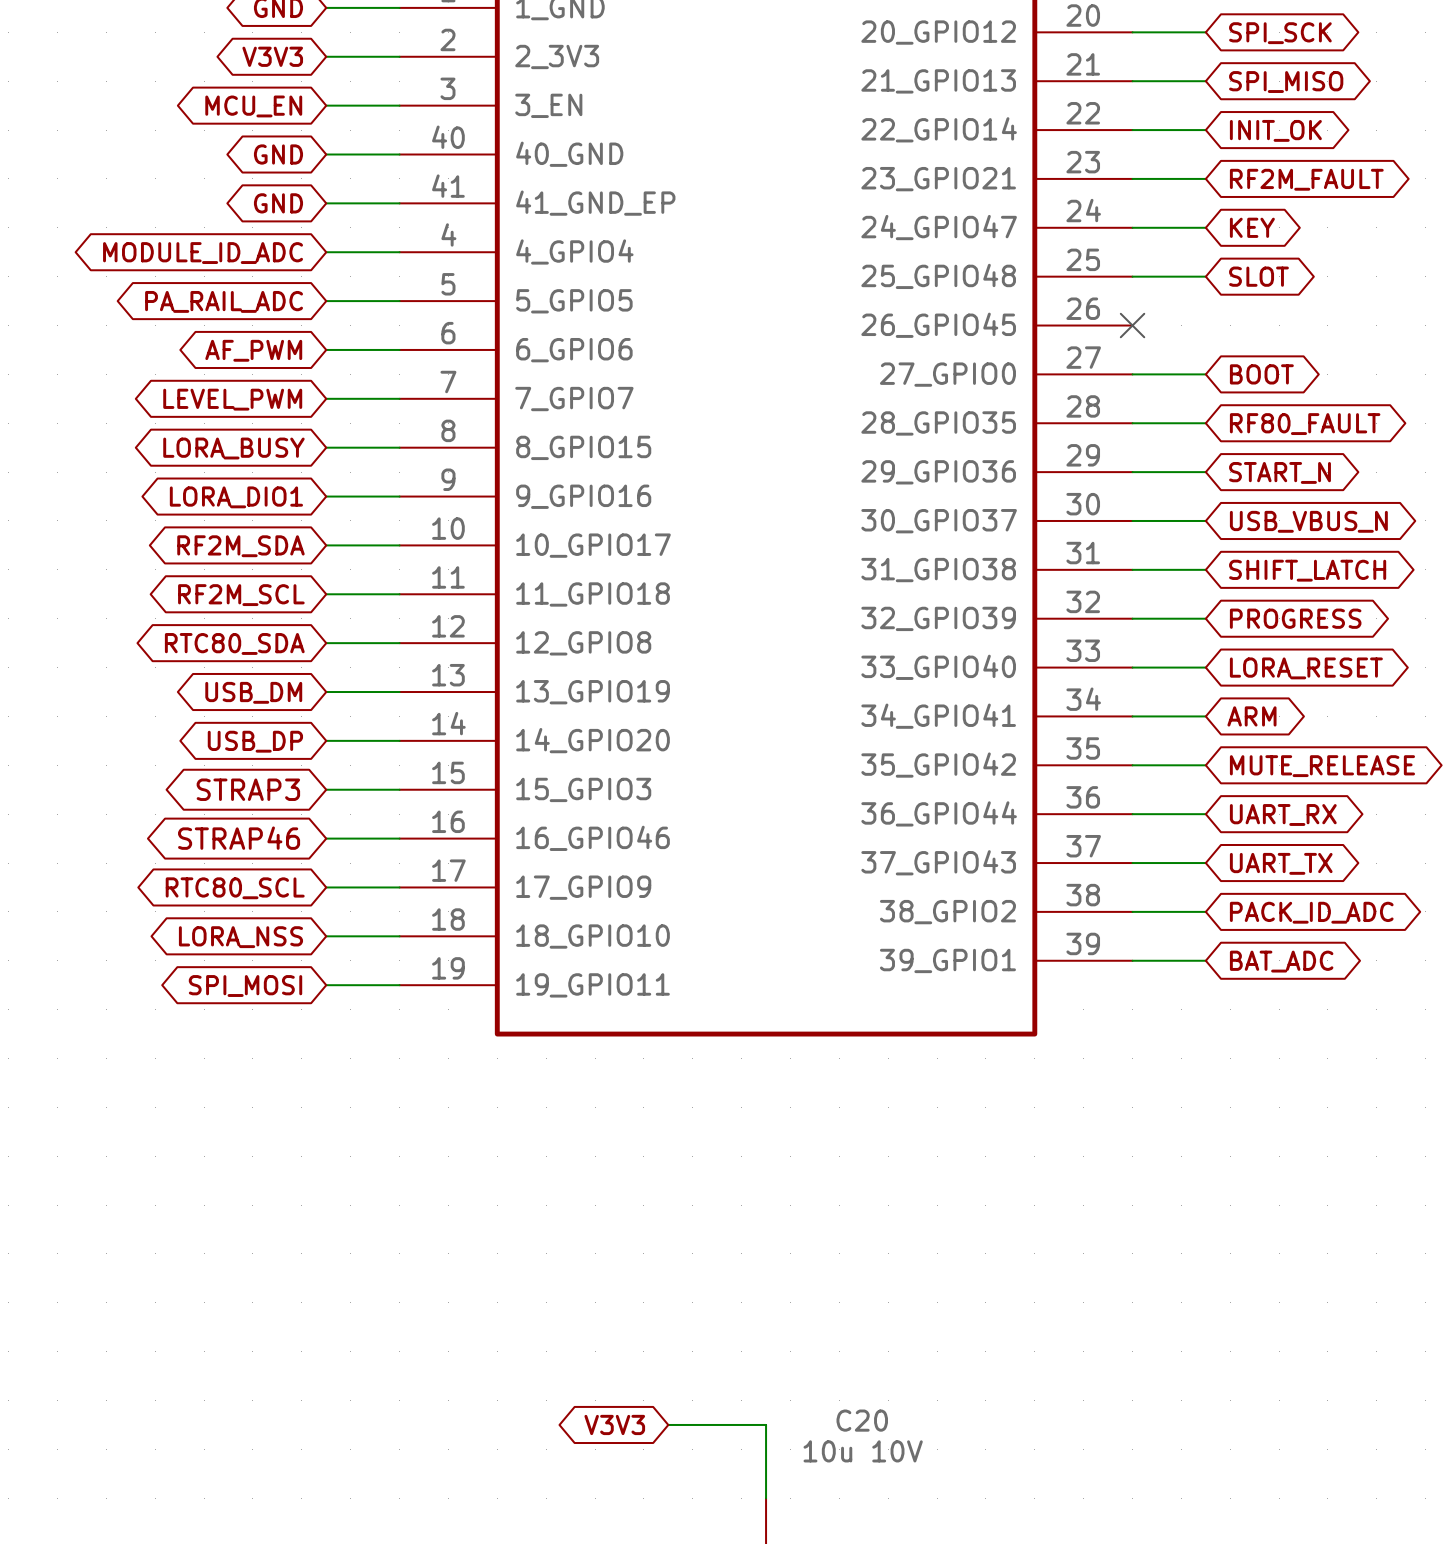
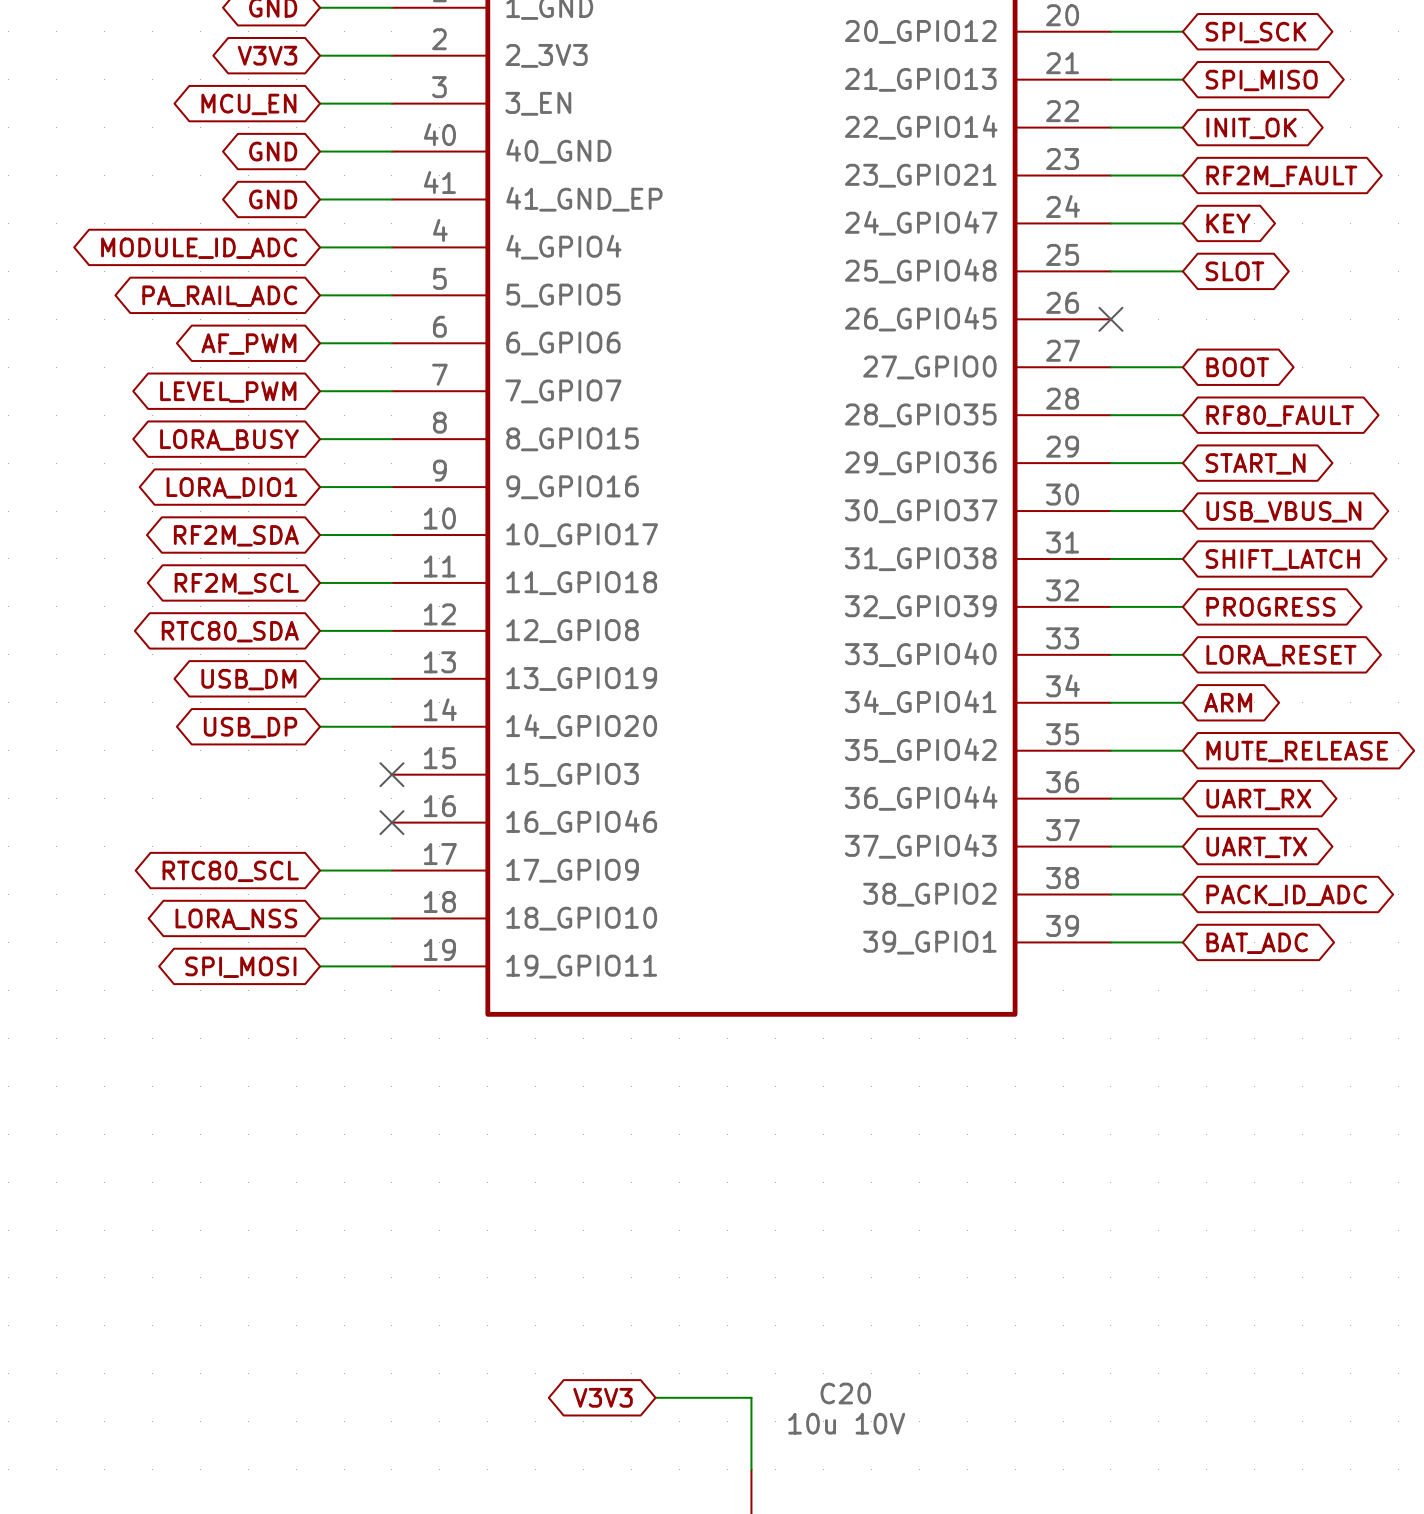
global label: STRAP3 (248, 789) -> none
wire: (326, 789) (399, 789) -> none
no-connect mark: none -> (391, 774)
global label: STRAP46 (239, 838) -> none
wire: (326, 838) (399, 838) -> none
no-connect mark: none -> (391, 822)

